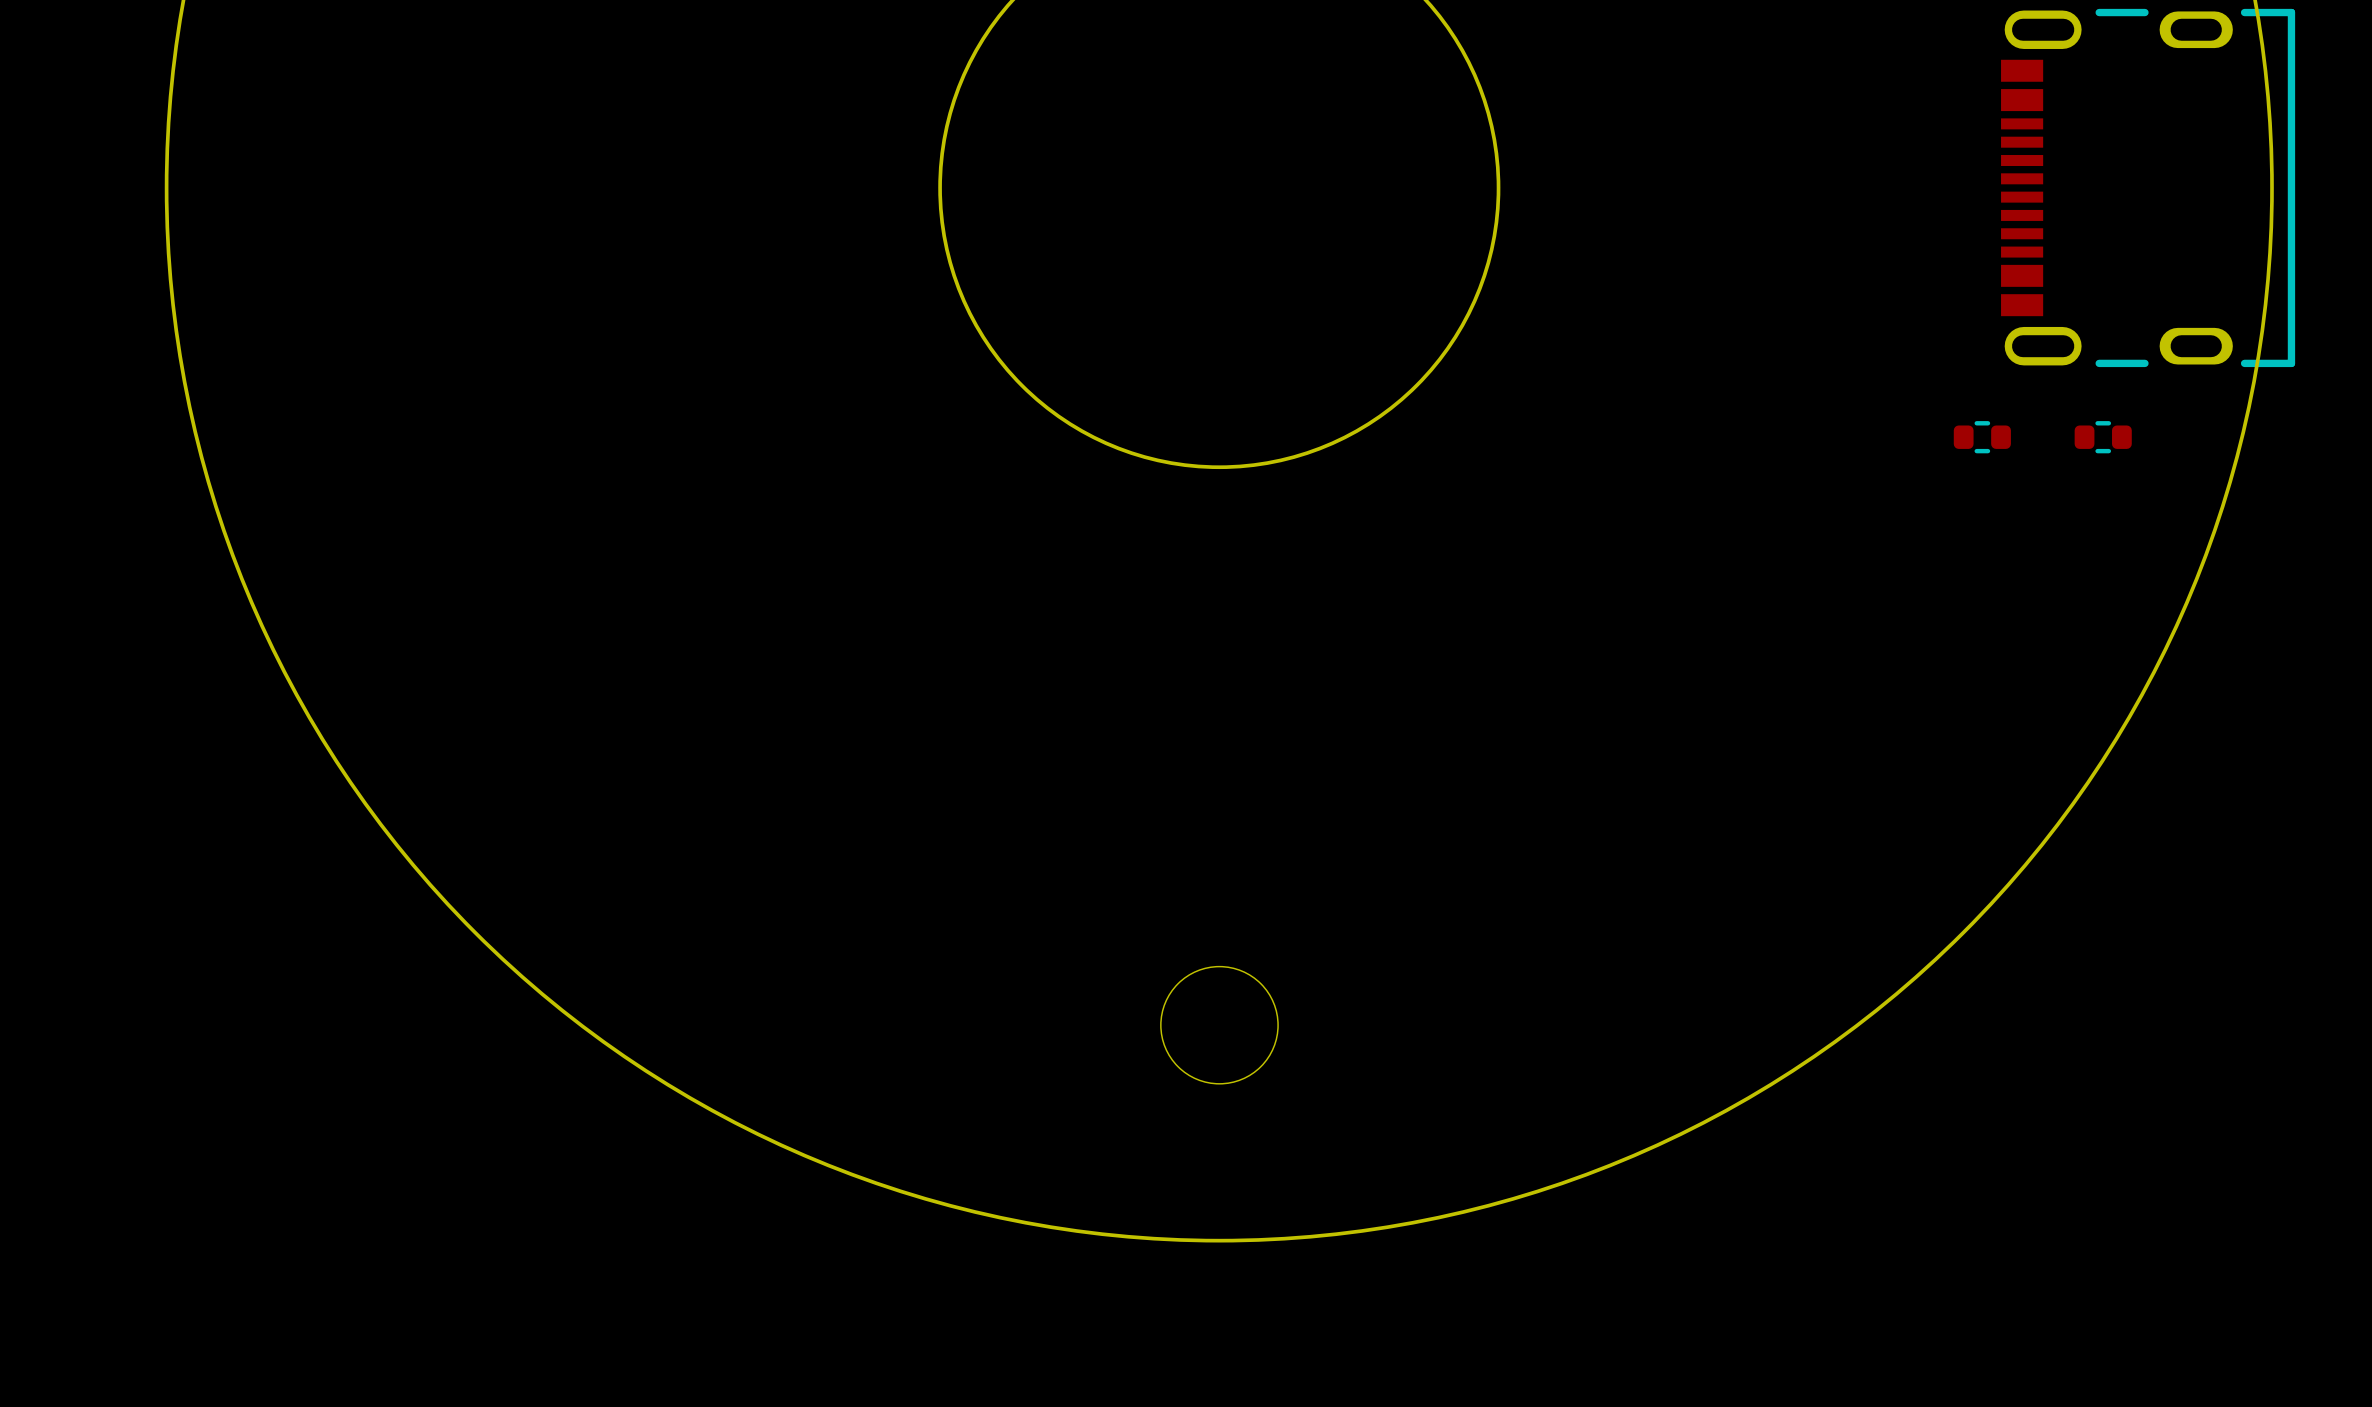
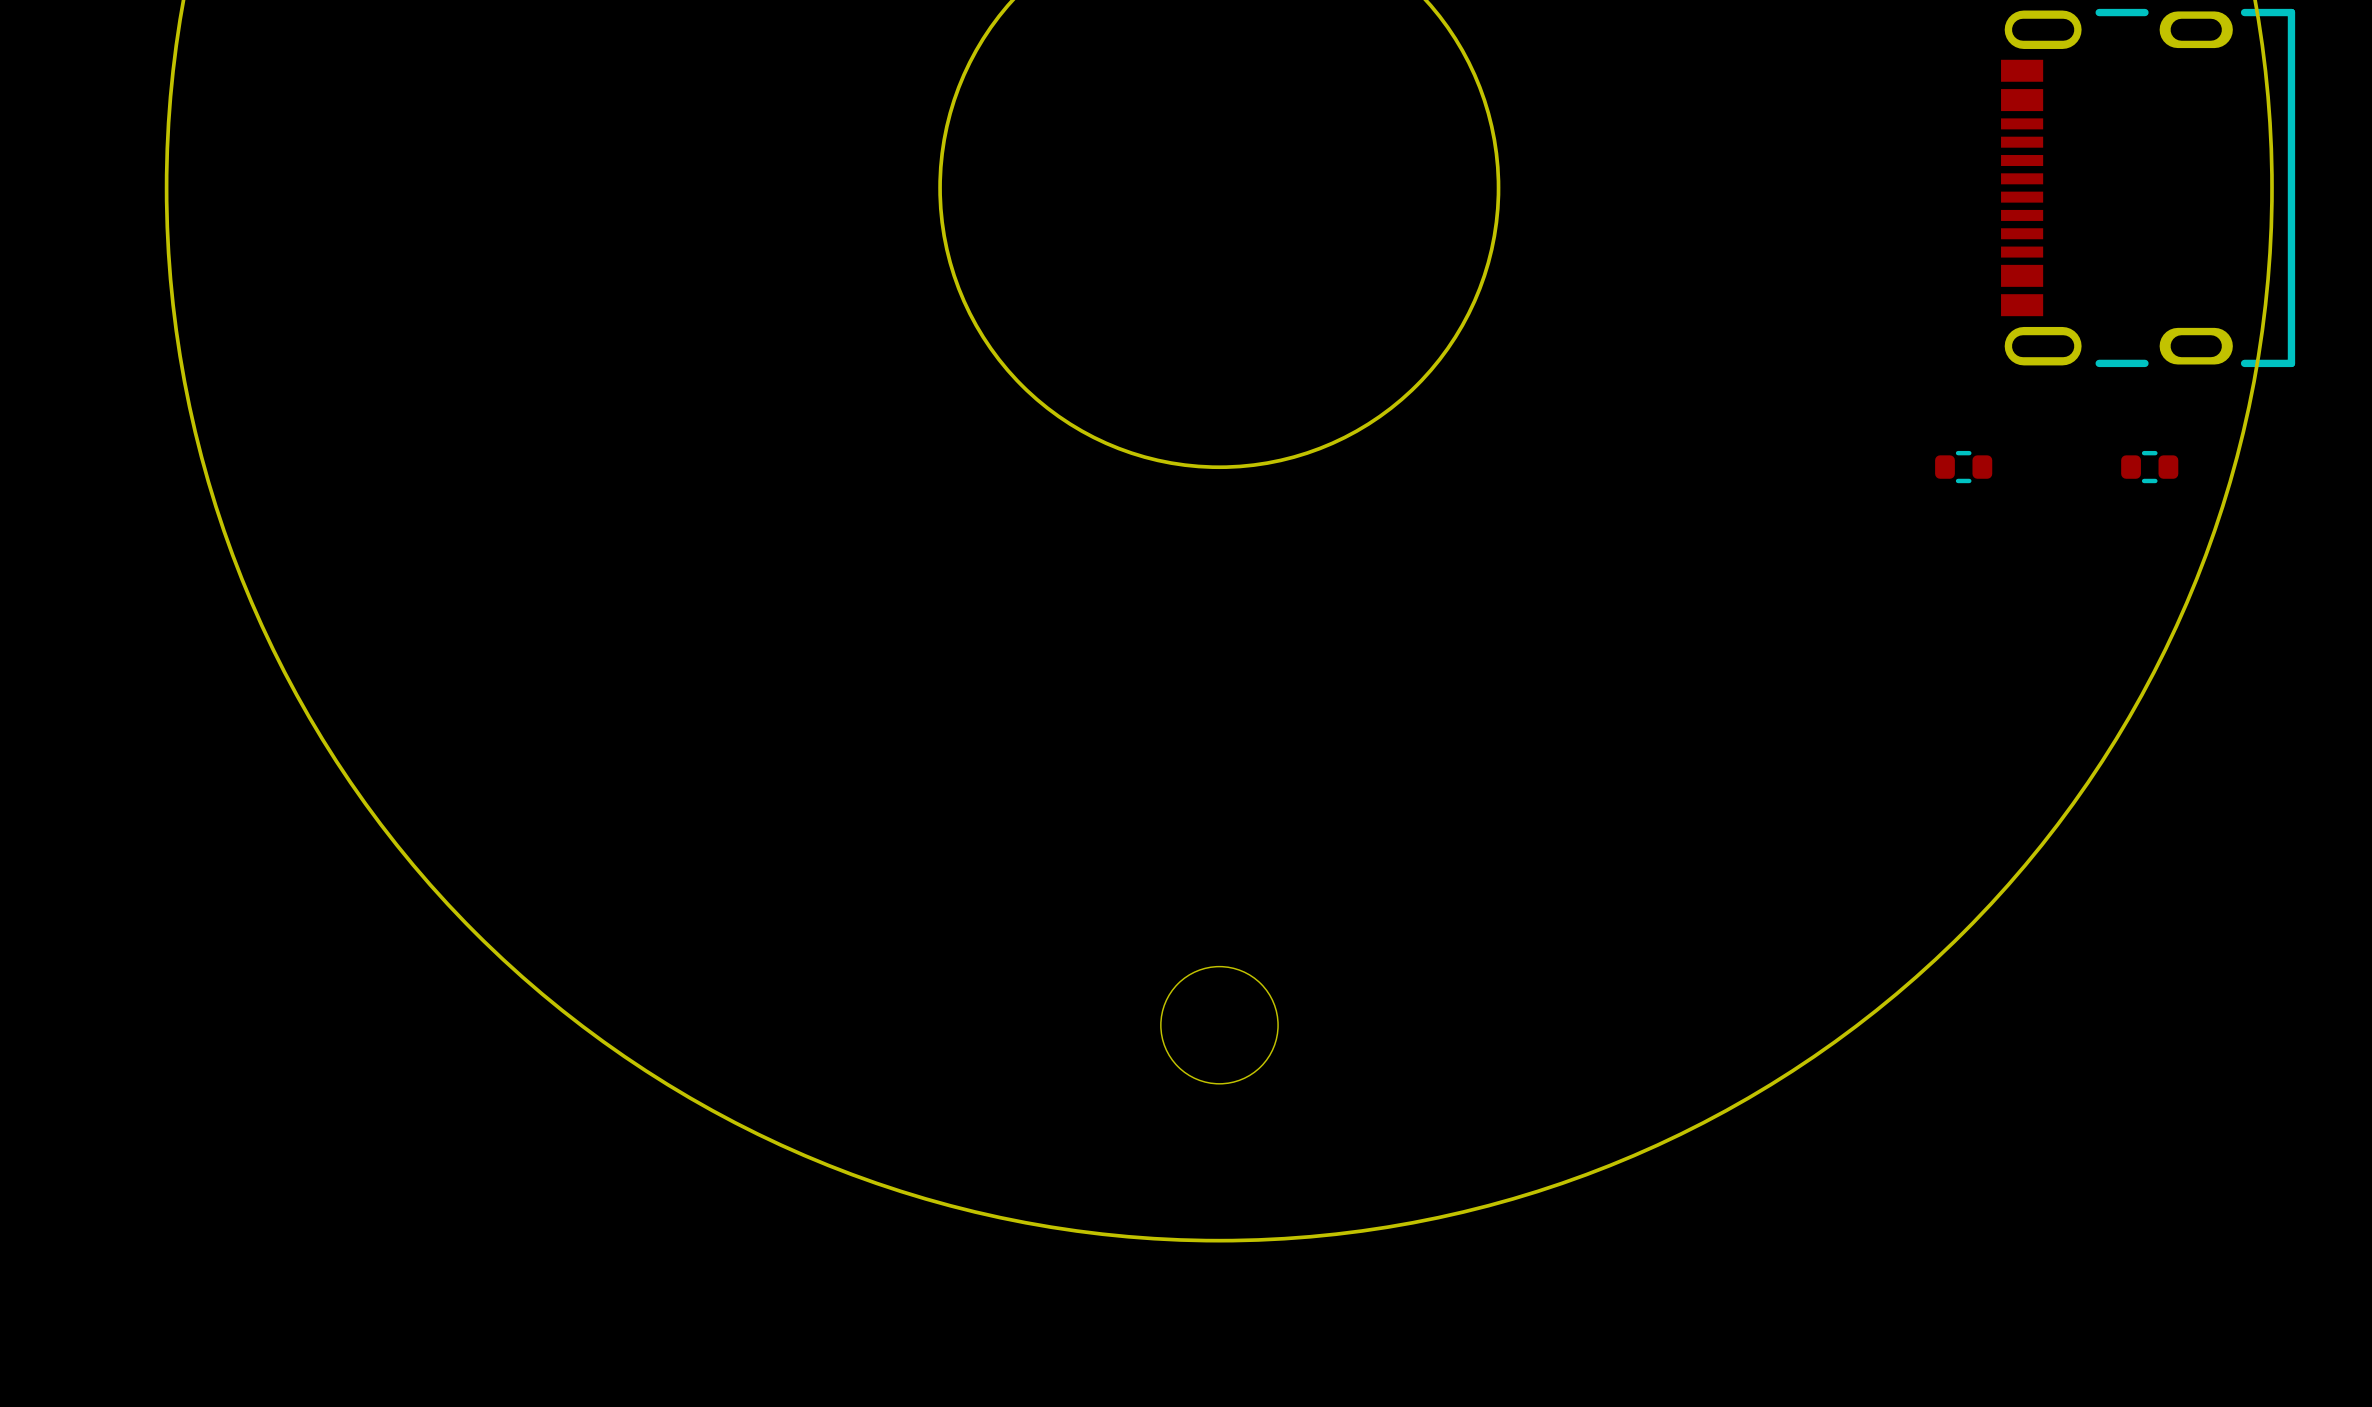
part position: (1982, 437) -> (1963, 467)
part position: (2103, 437) -> (2149, 467)

